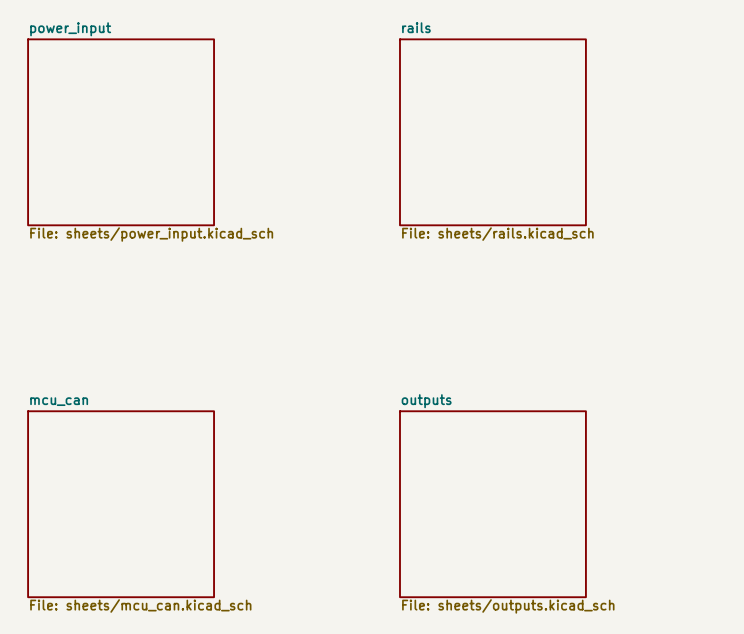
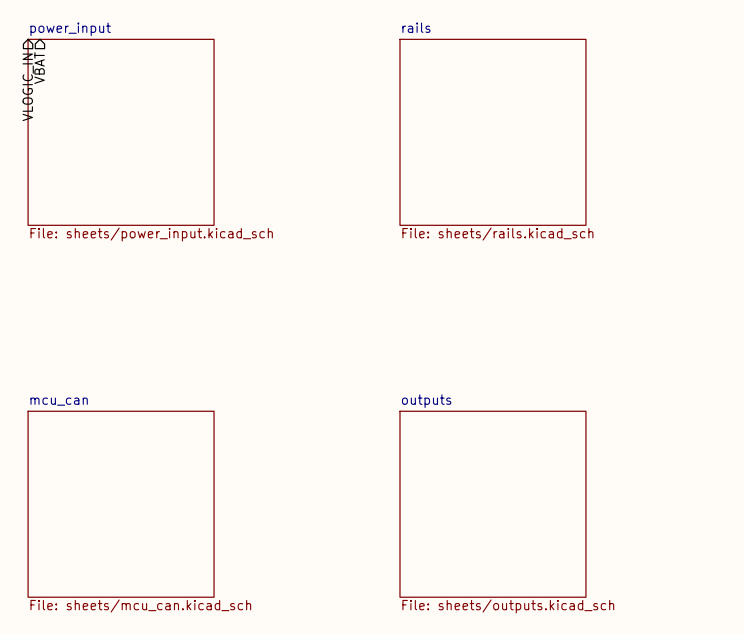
sheet pin: none -> VBAT (39, 68)
sheet pin: none -> VLOGIC_IN (28, 87)

